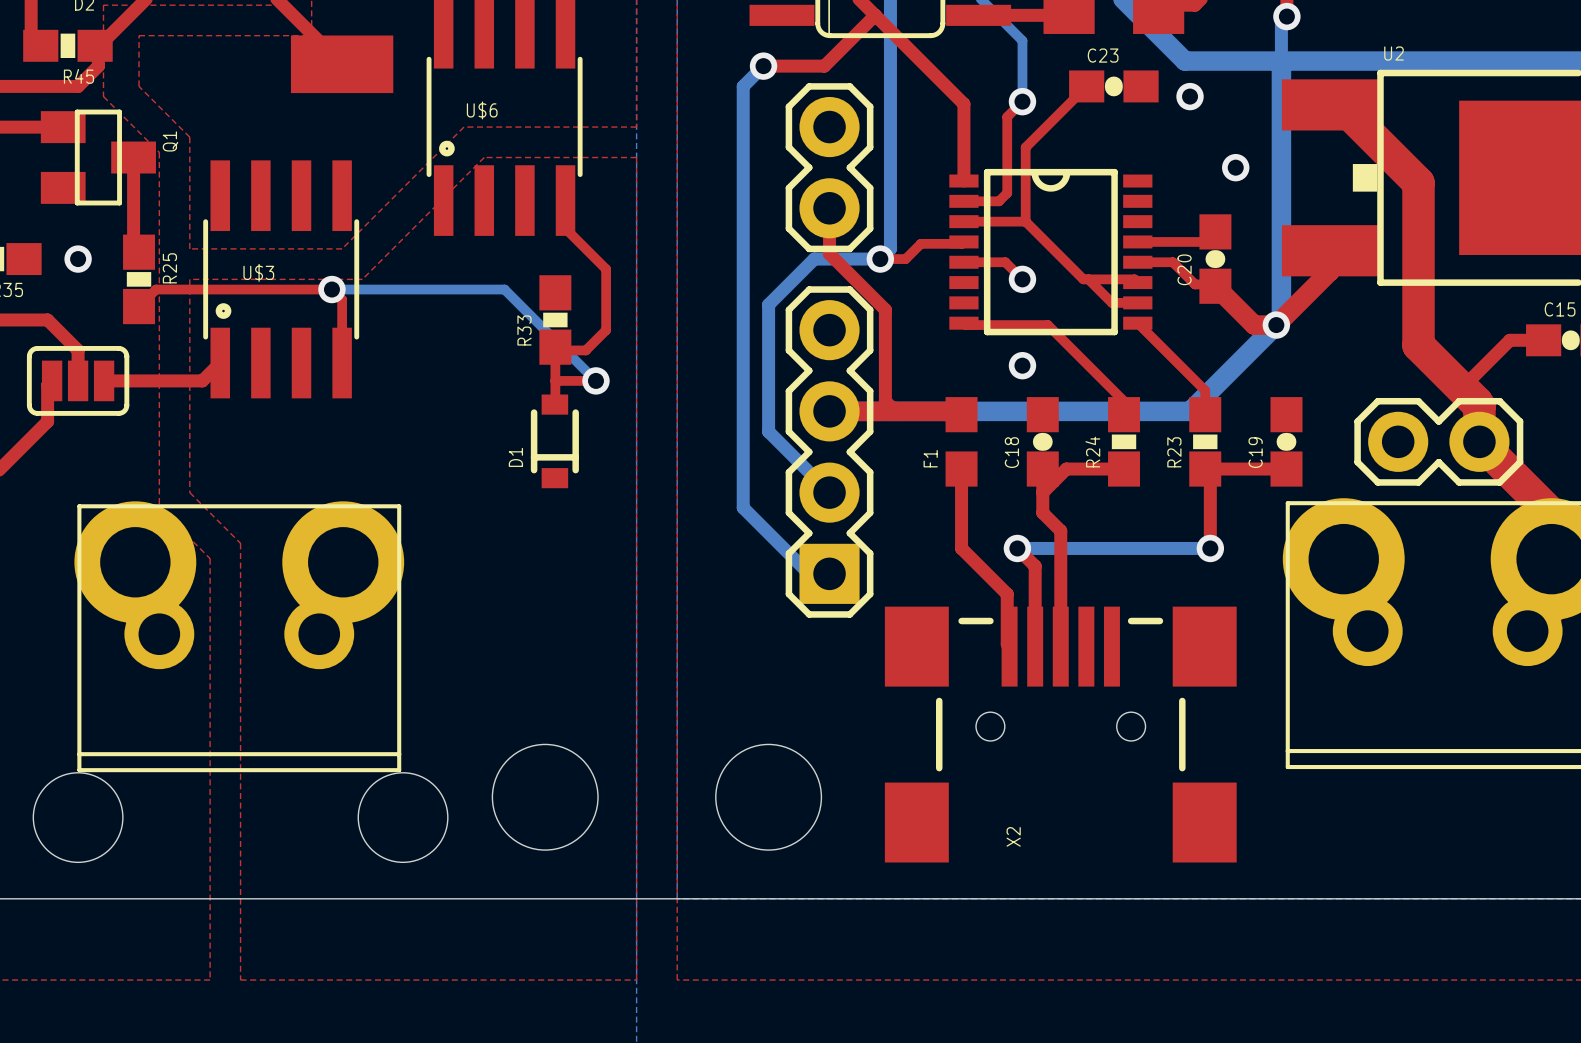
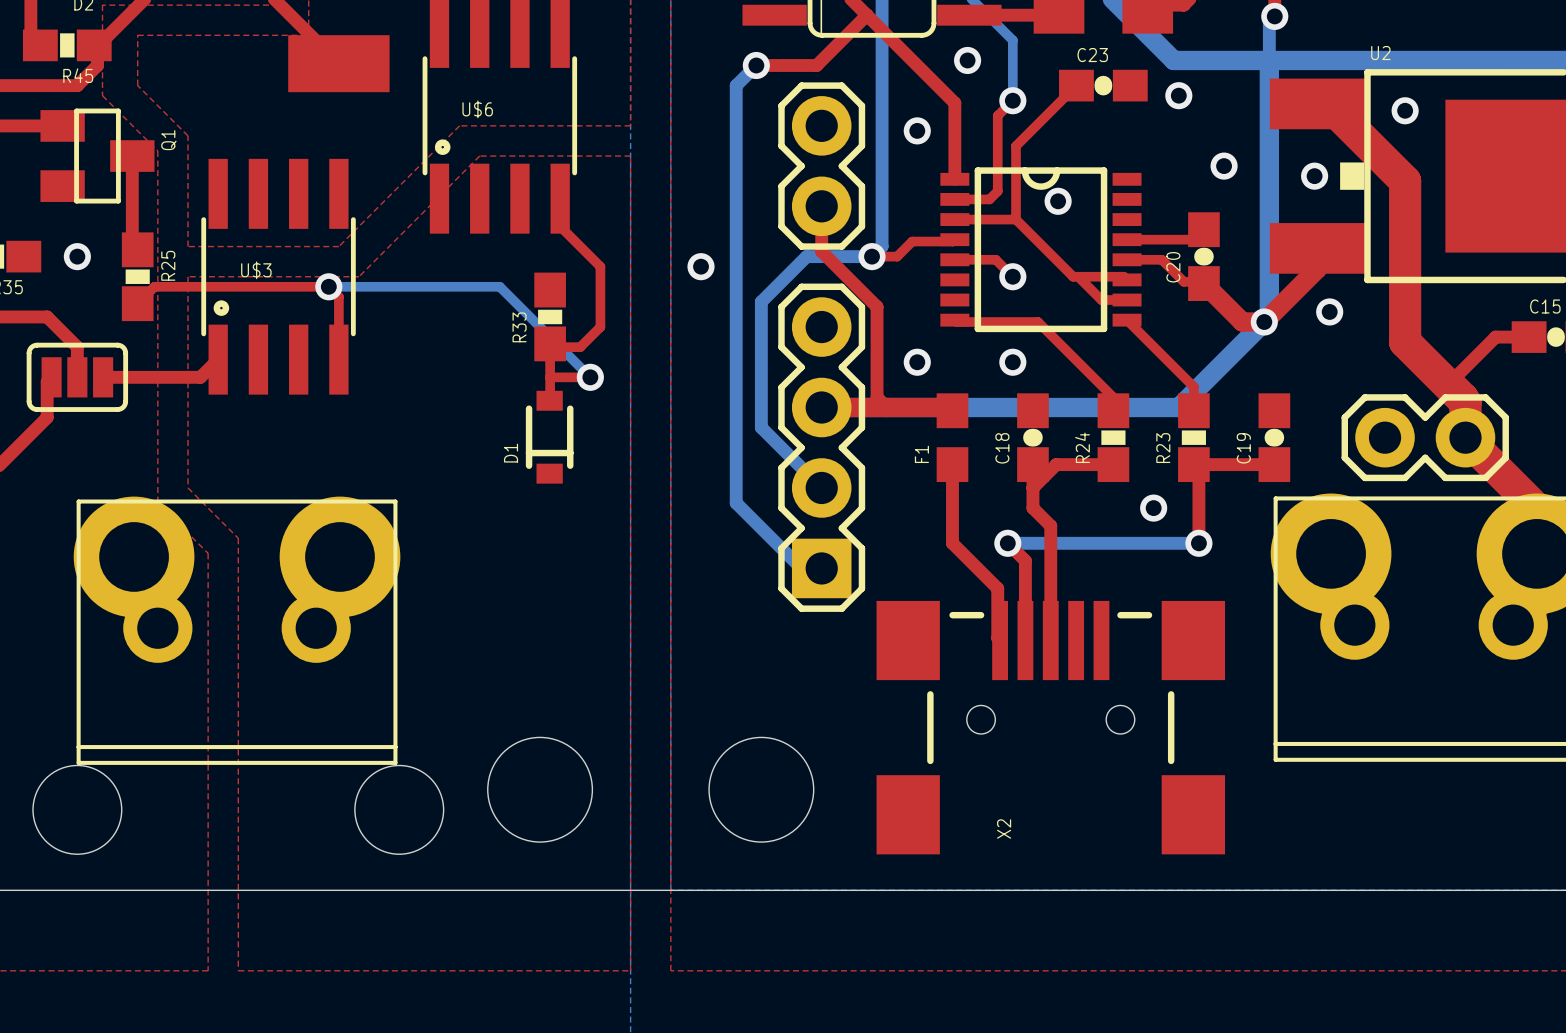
via: none -> (967, 60)
via: none -> (1405, 110)
via: none -> (917, 130)
via: none -> (1314, 176)
via: none -> (1058, 201)
via: none -> (701, 266)
via: none -> (1329, 311)
via: none -> (917, 362)
via: none -> (1153, 508)

